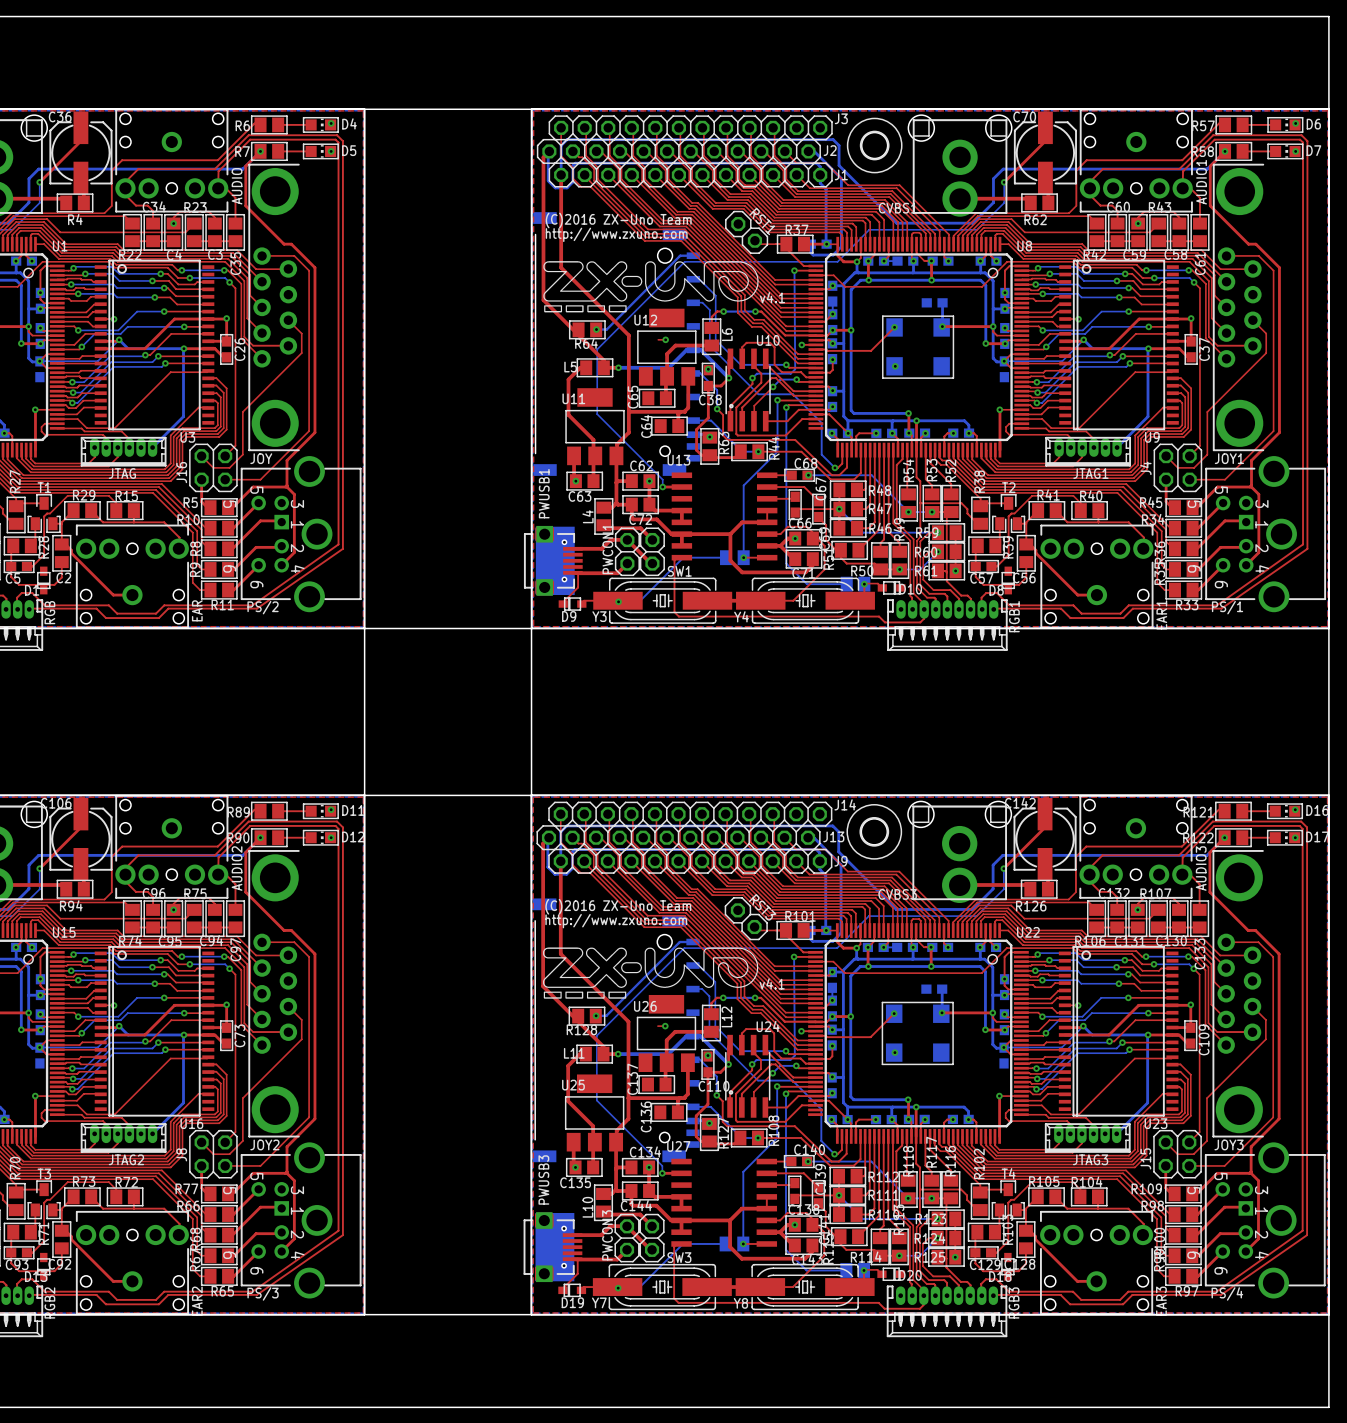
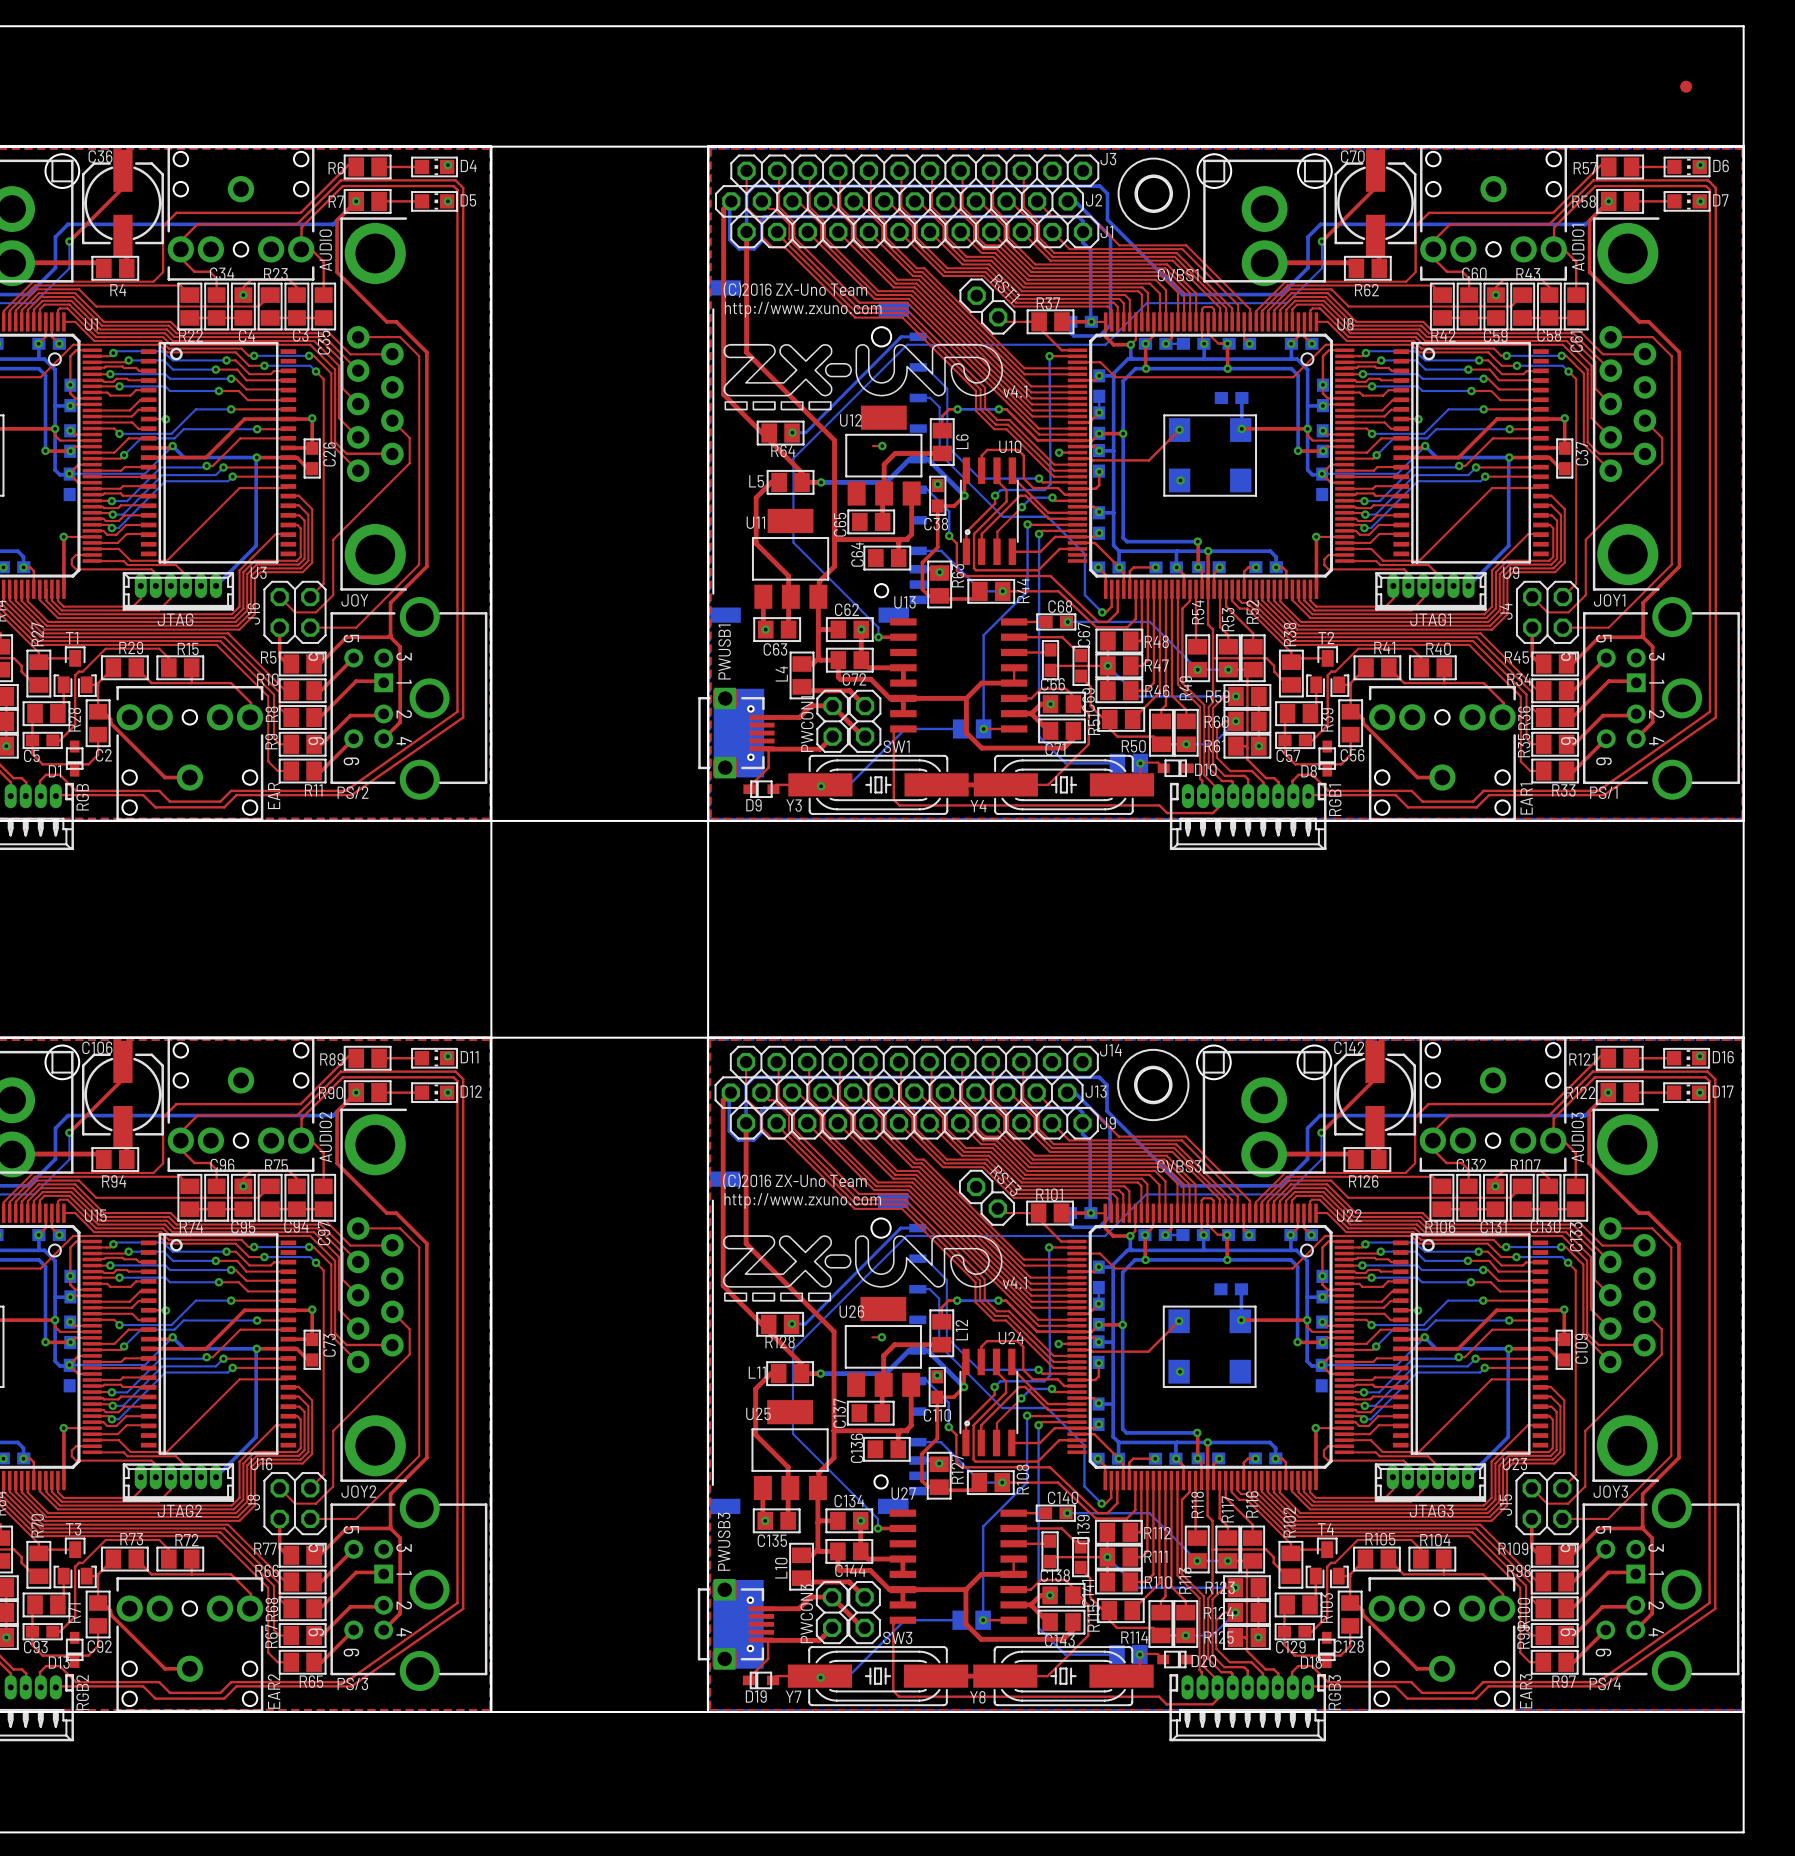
part: none -> (1686, 86)

